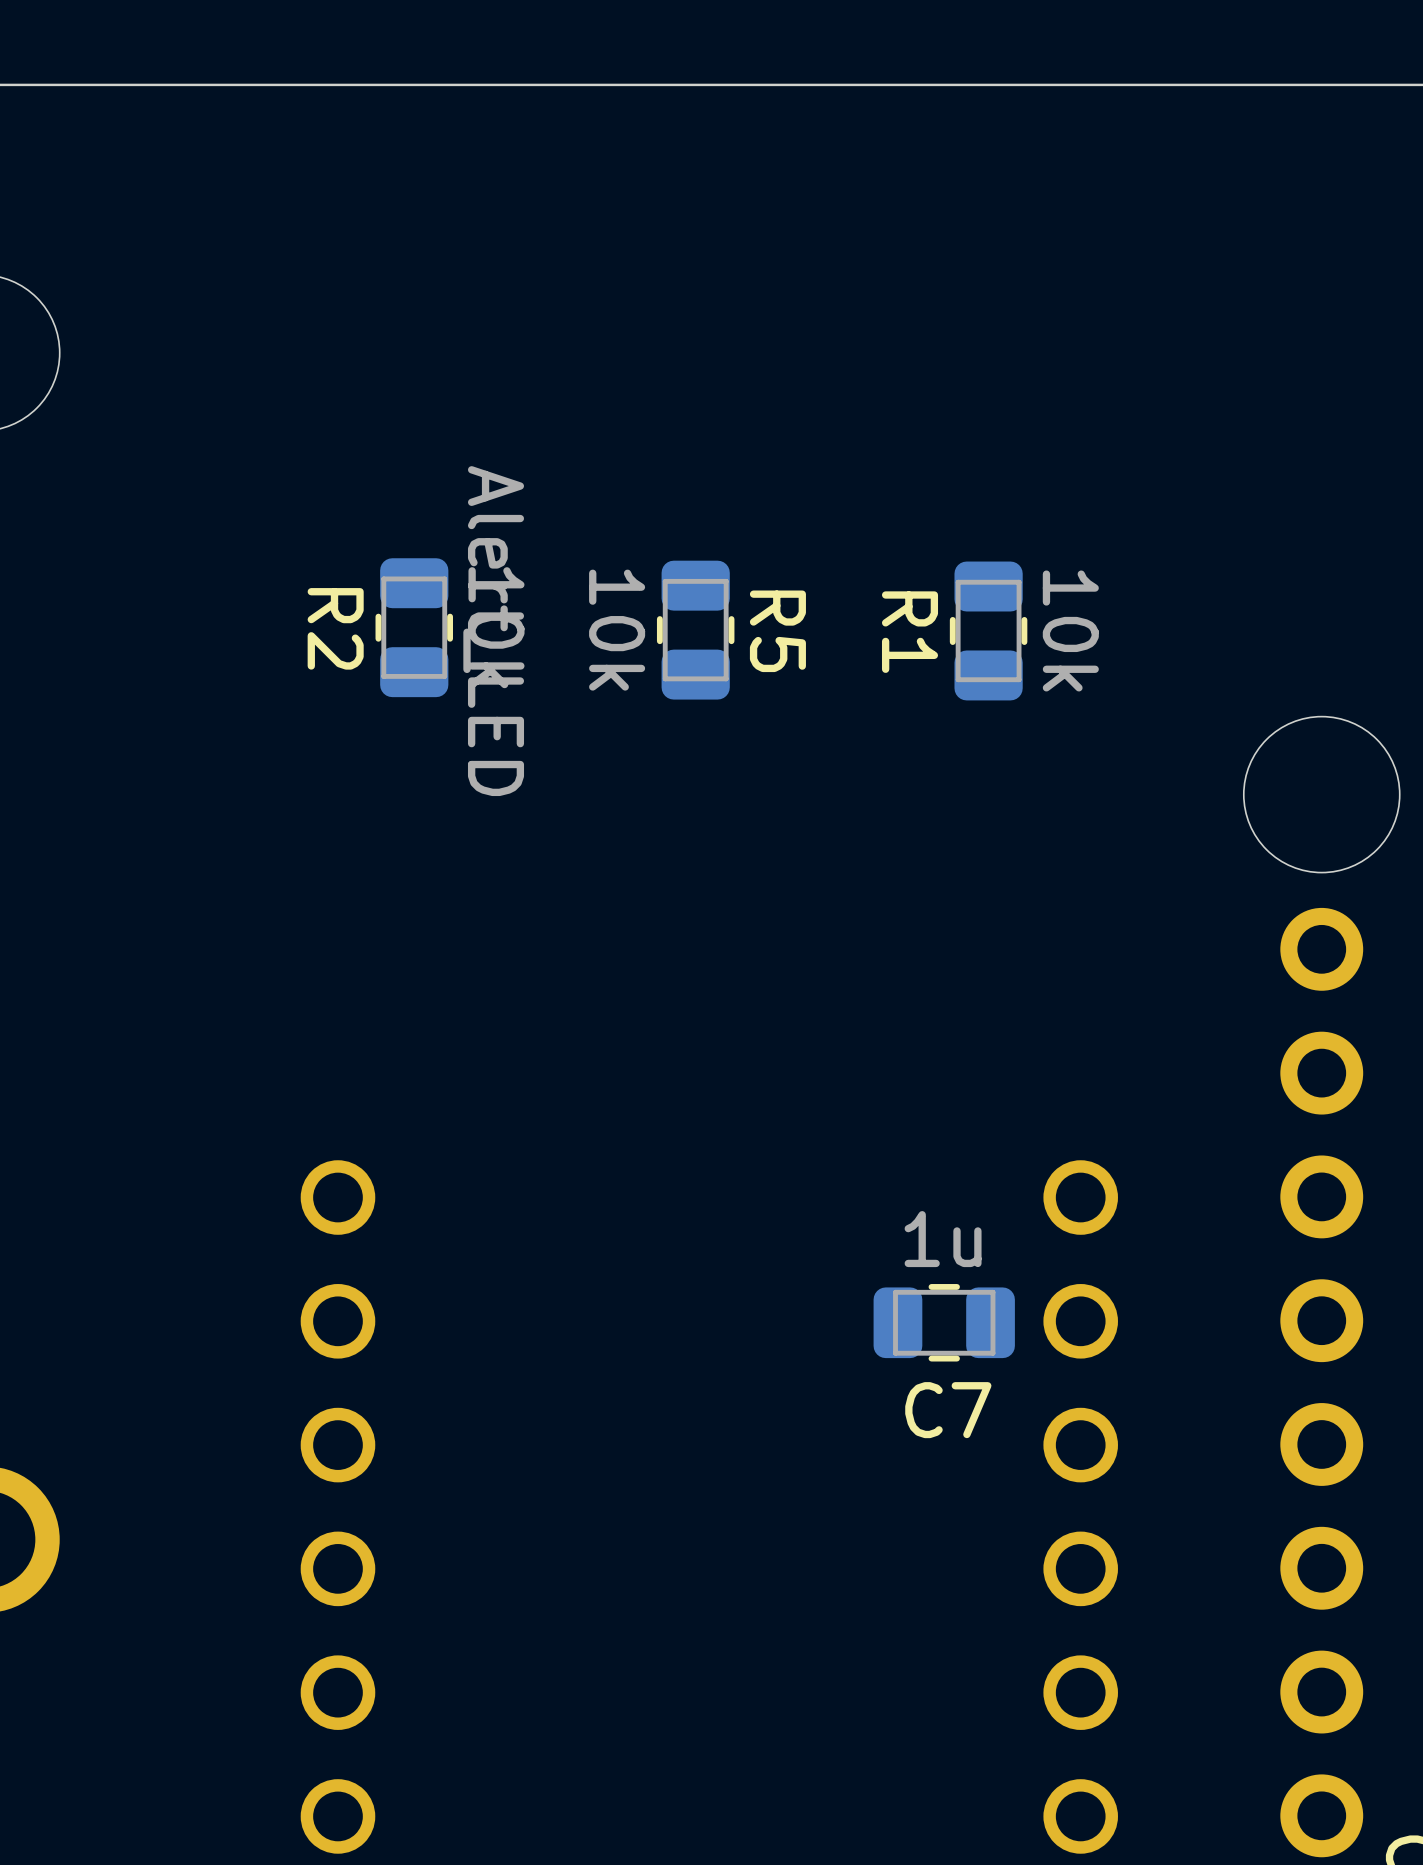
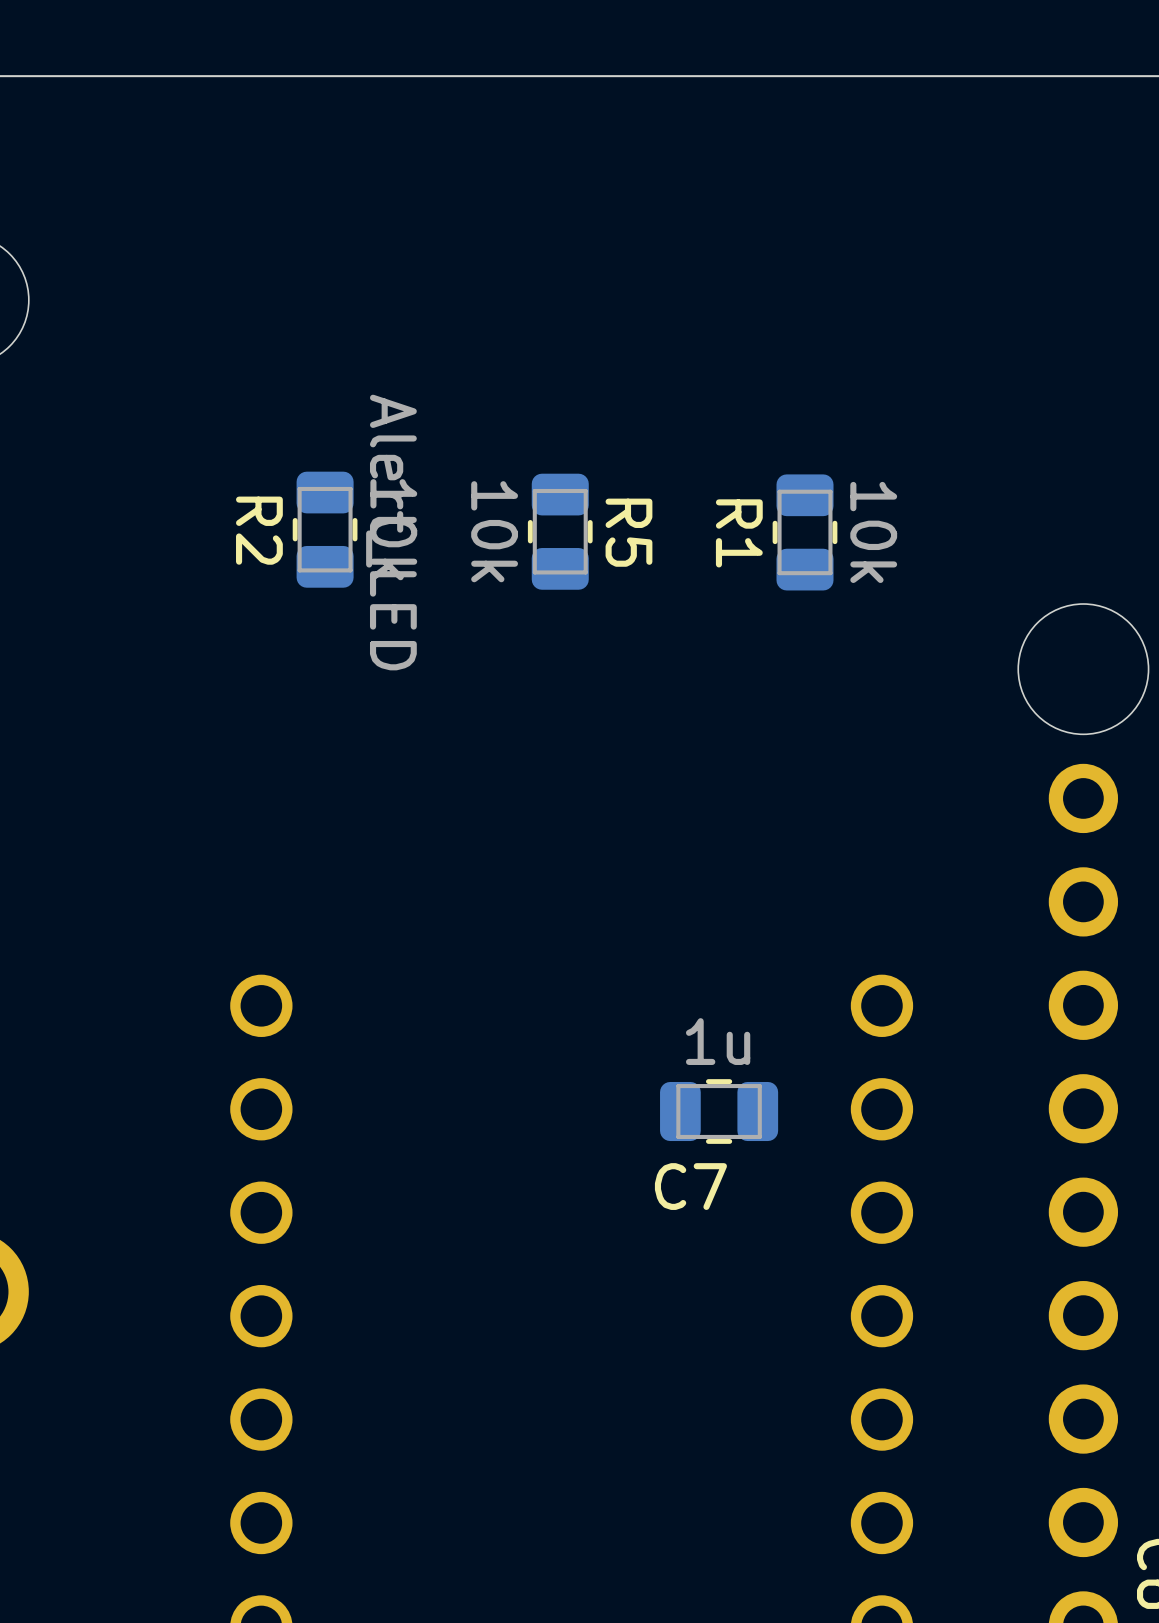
C7 position: (944, 1322) -> (719, 1111)
C7 name position: C7 (948, 1410) -> C7 (690, 1186)

